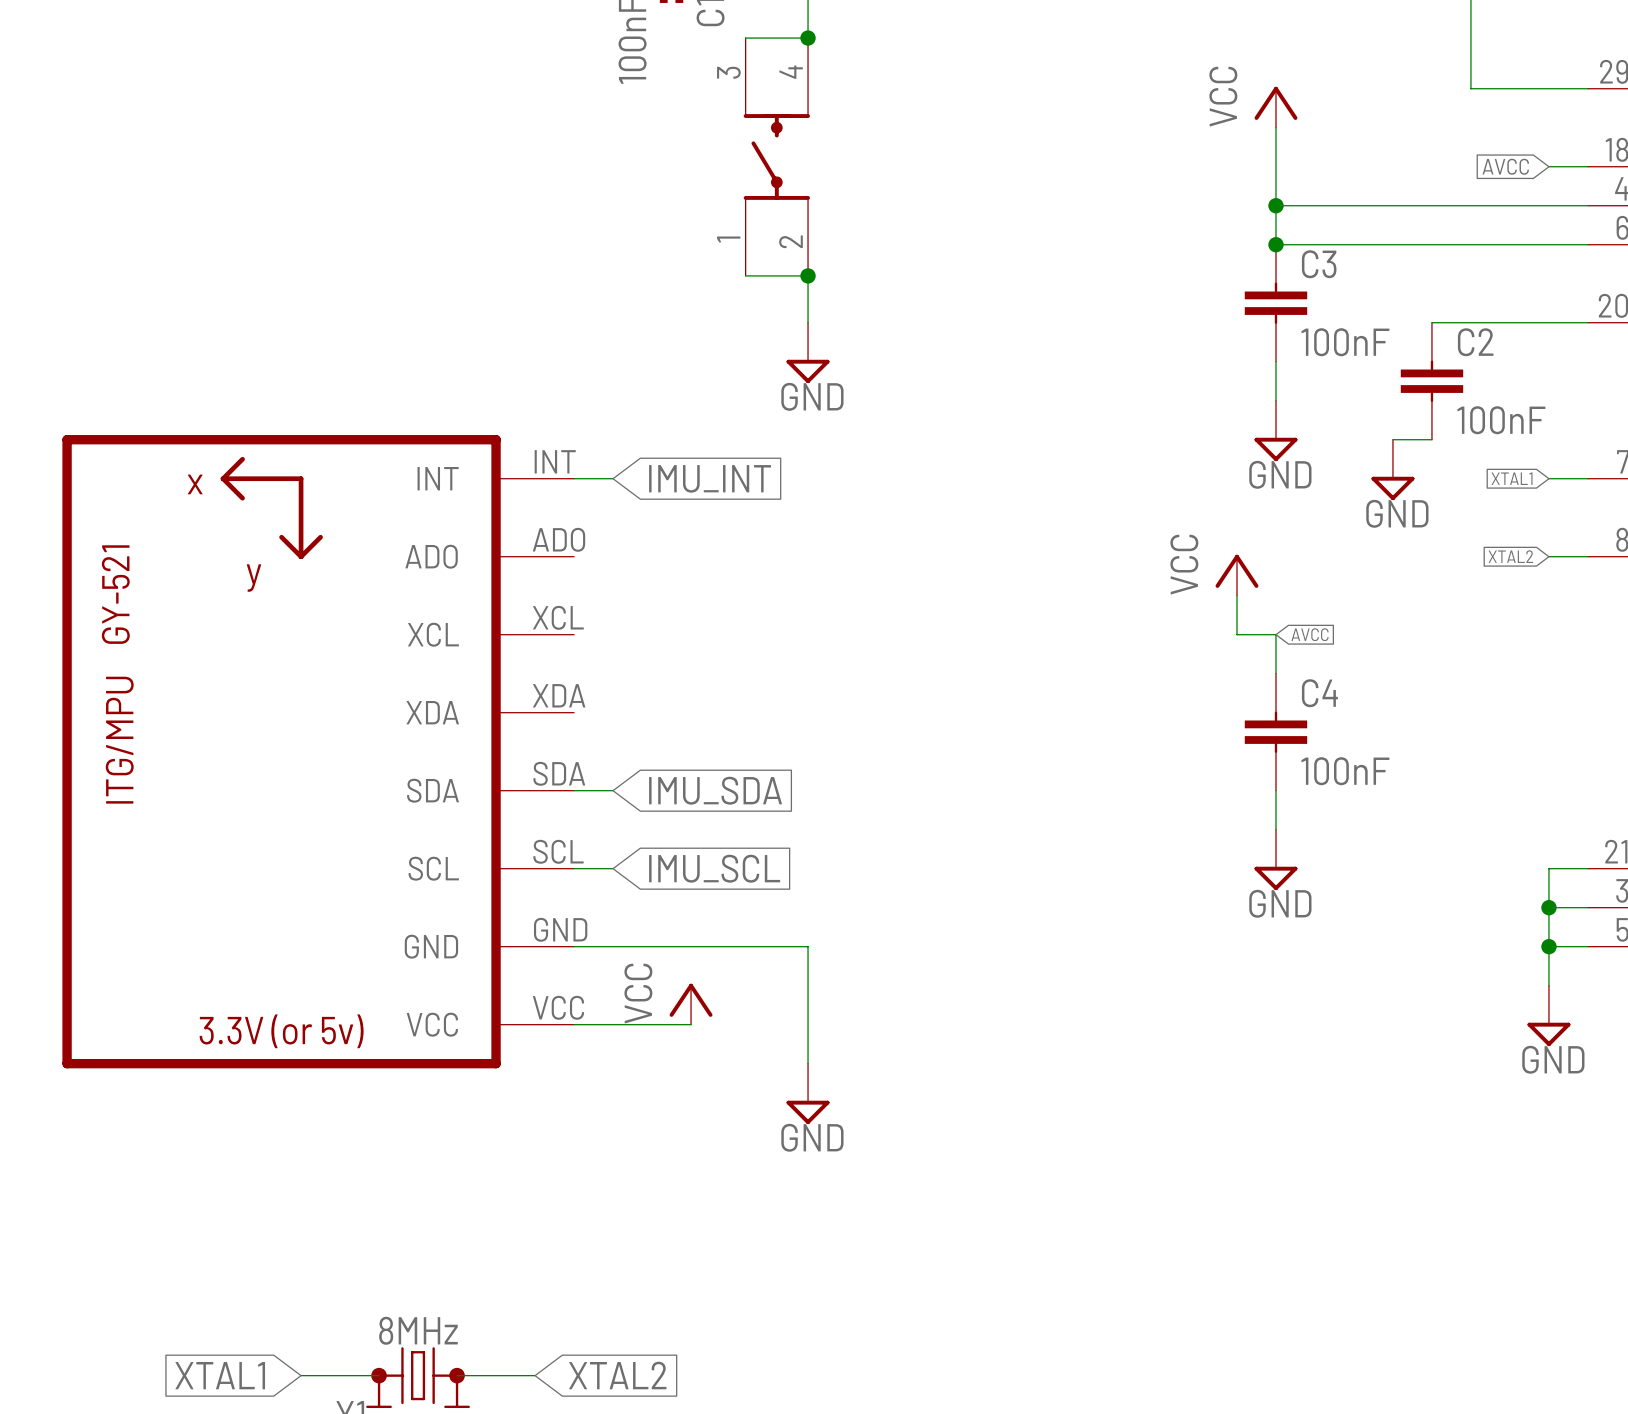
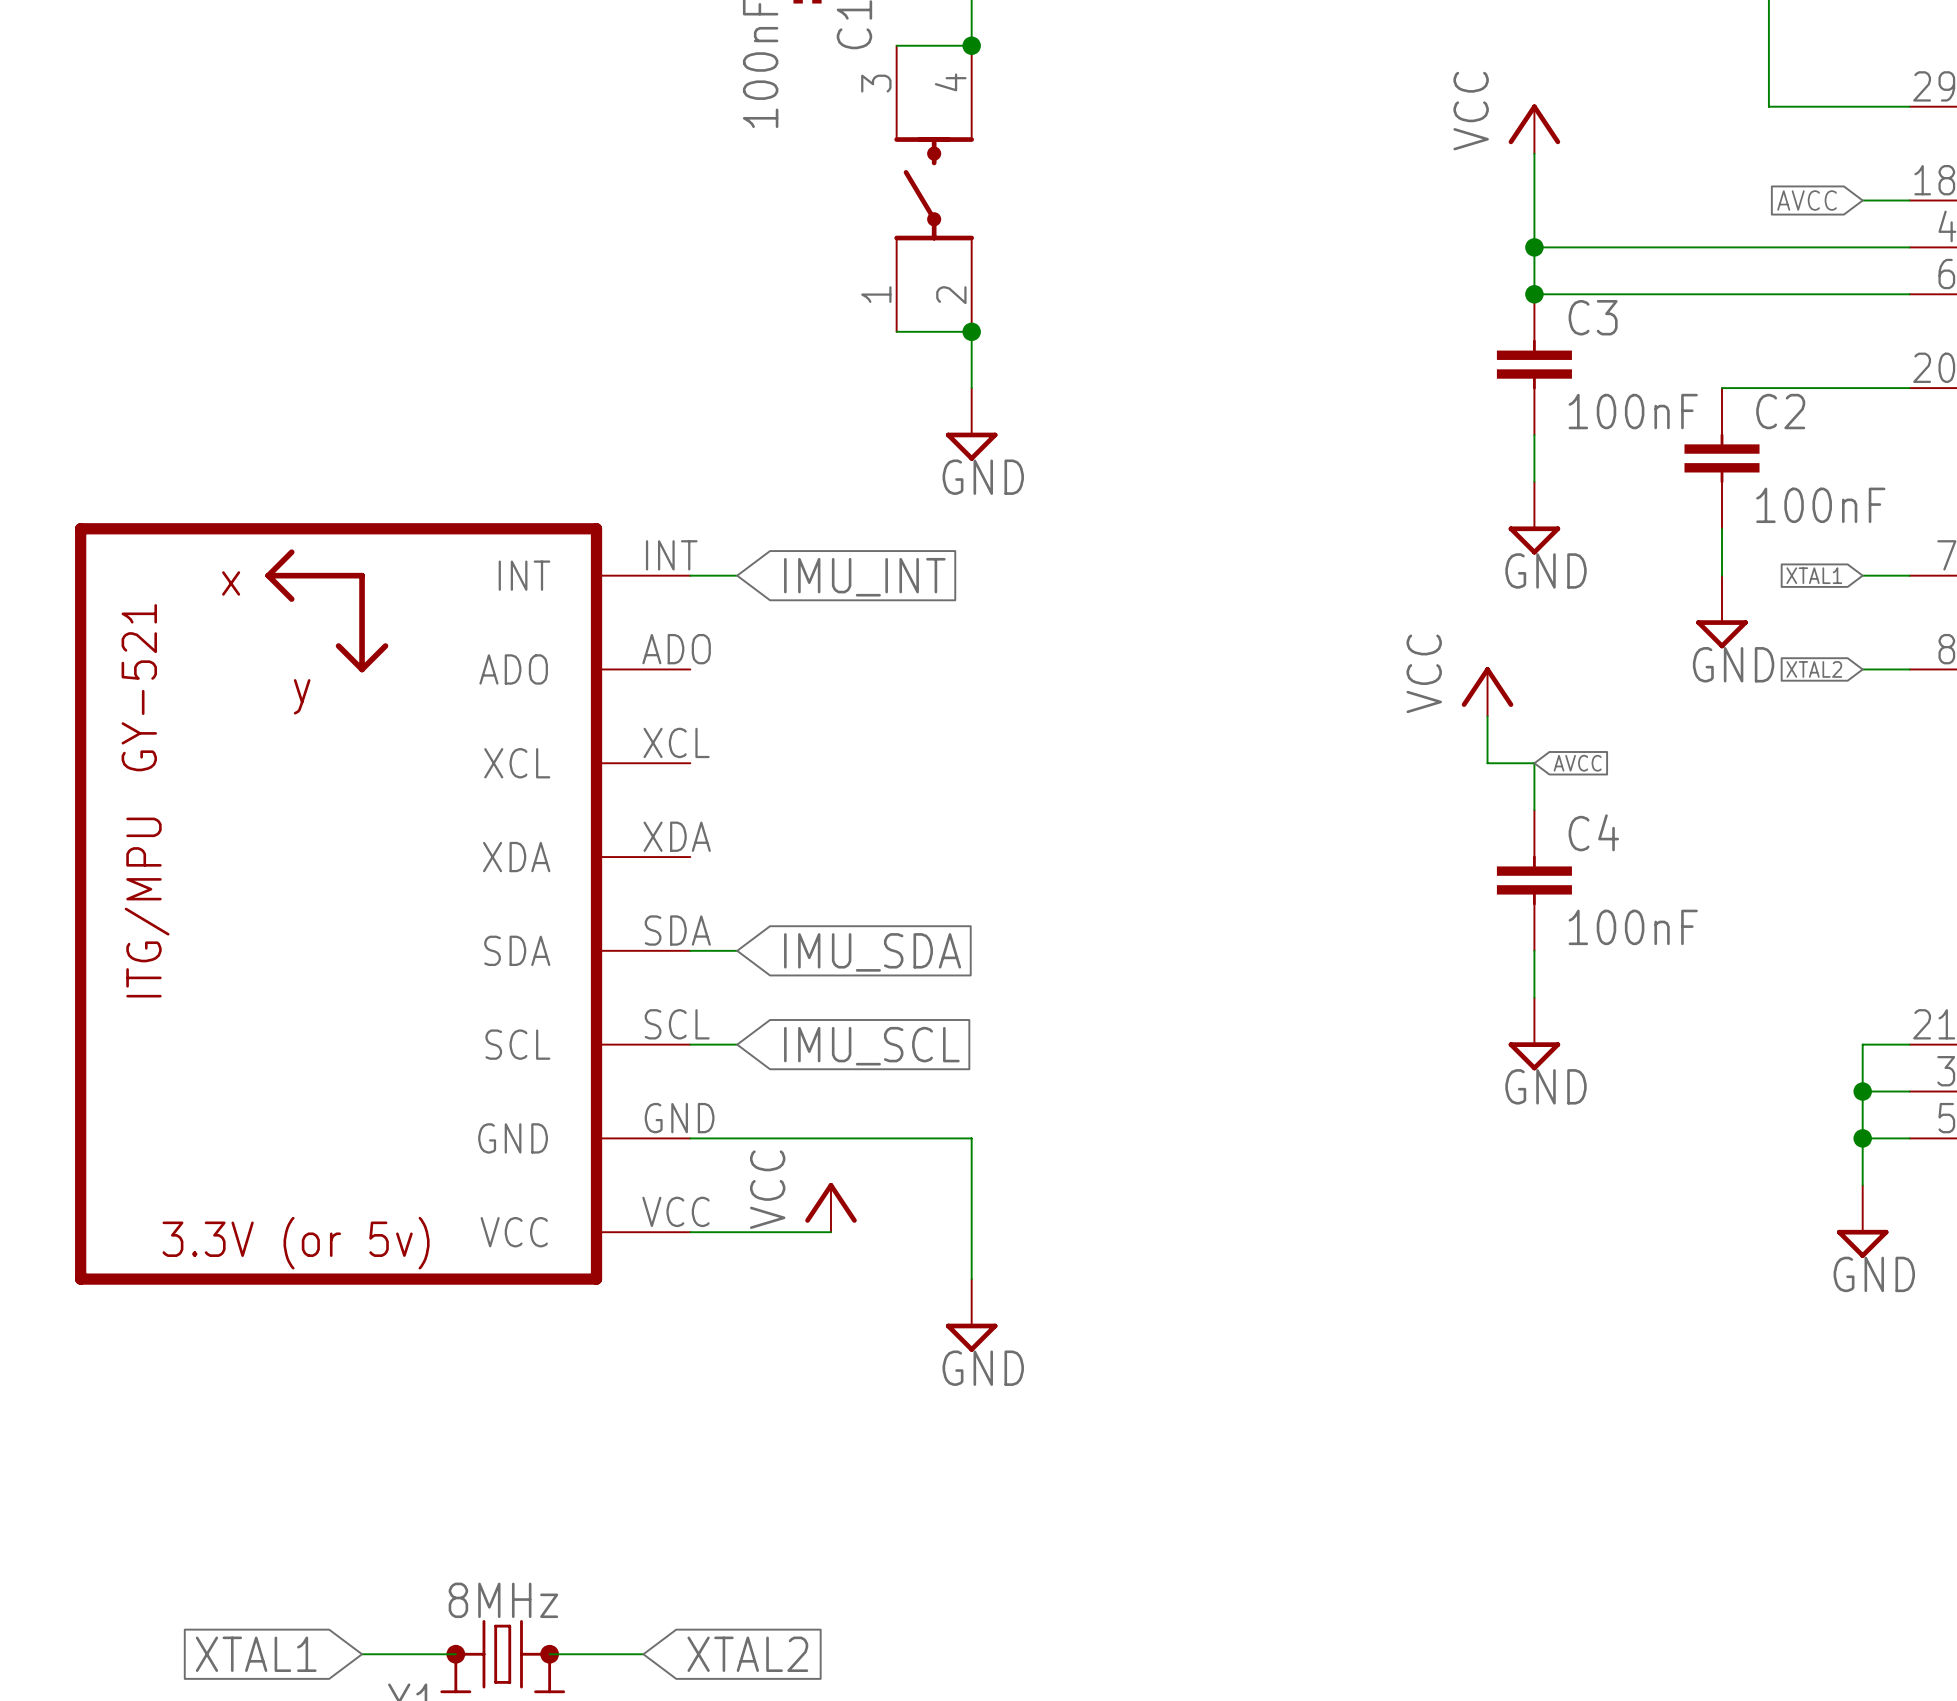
wire: (1392, 439) (1431, 439) -> (1722, 575) (1722, 528)
power symbol position: GND (1392, 469) -> GND (1722, 612)

